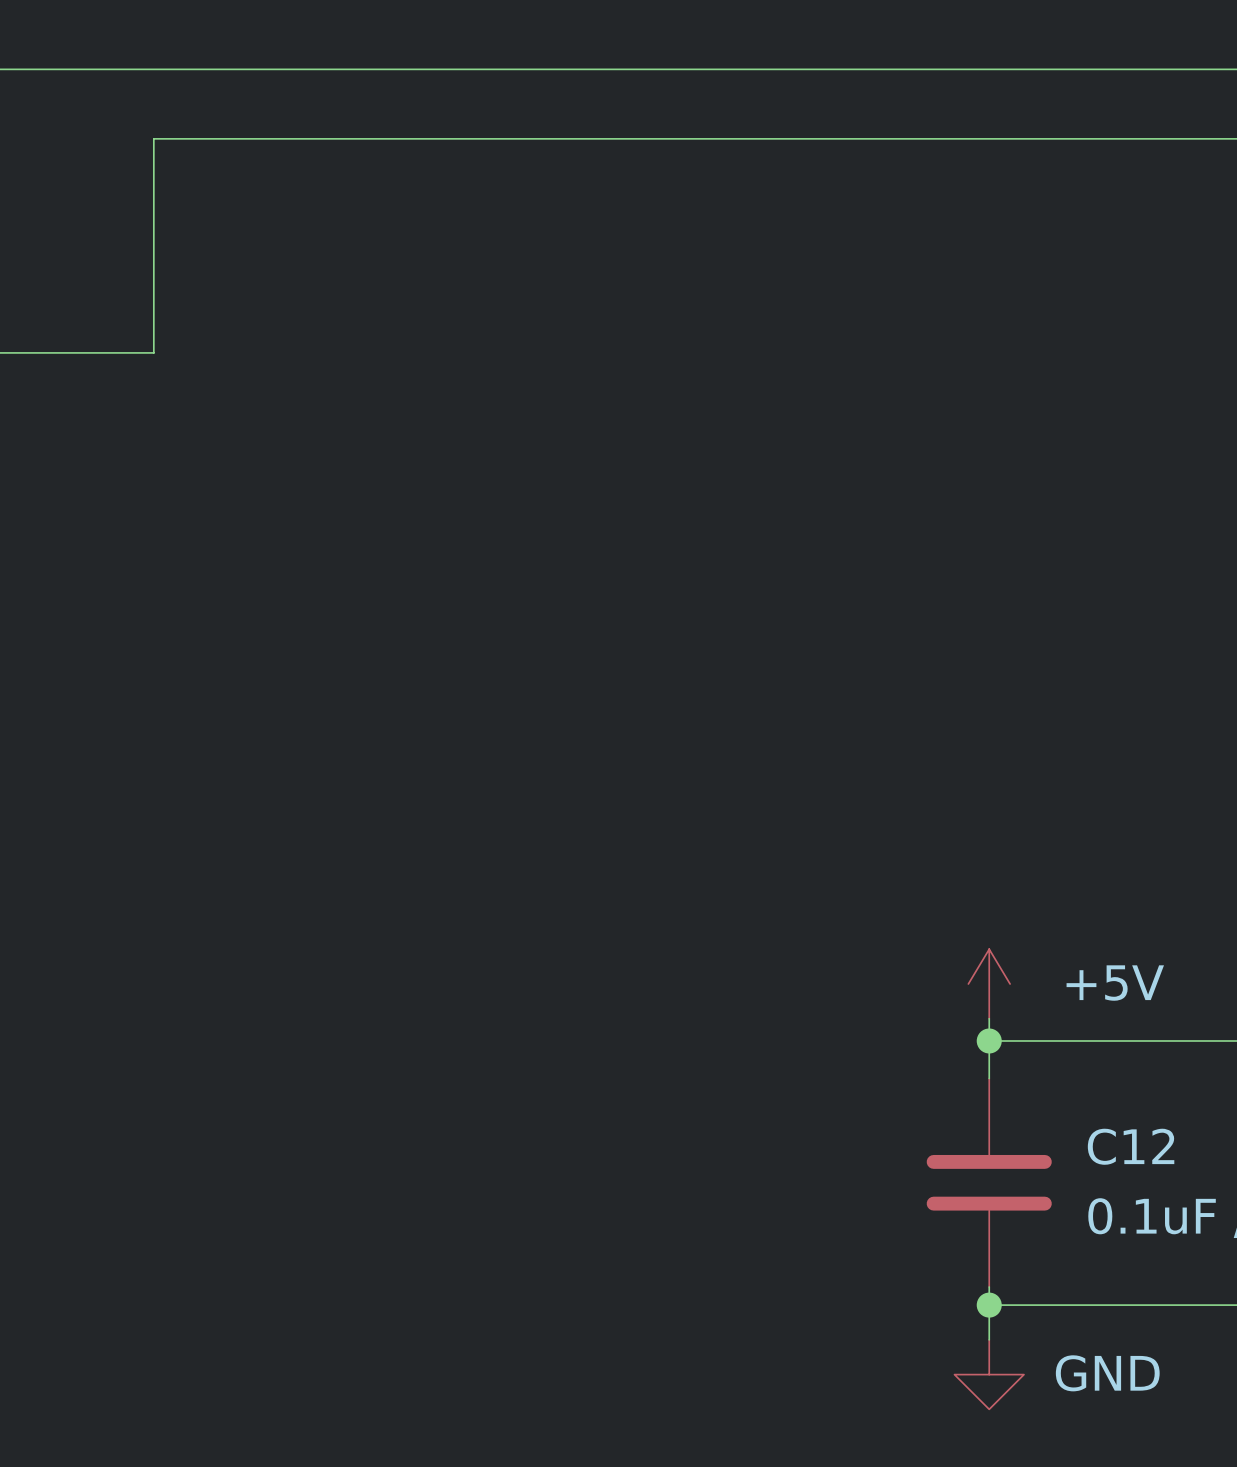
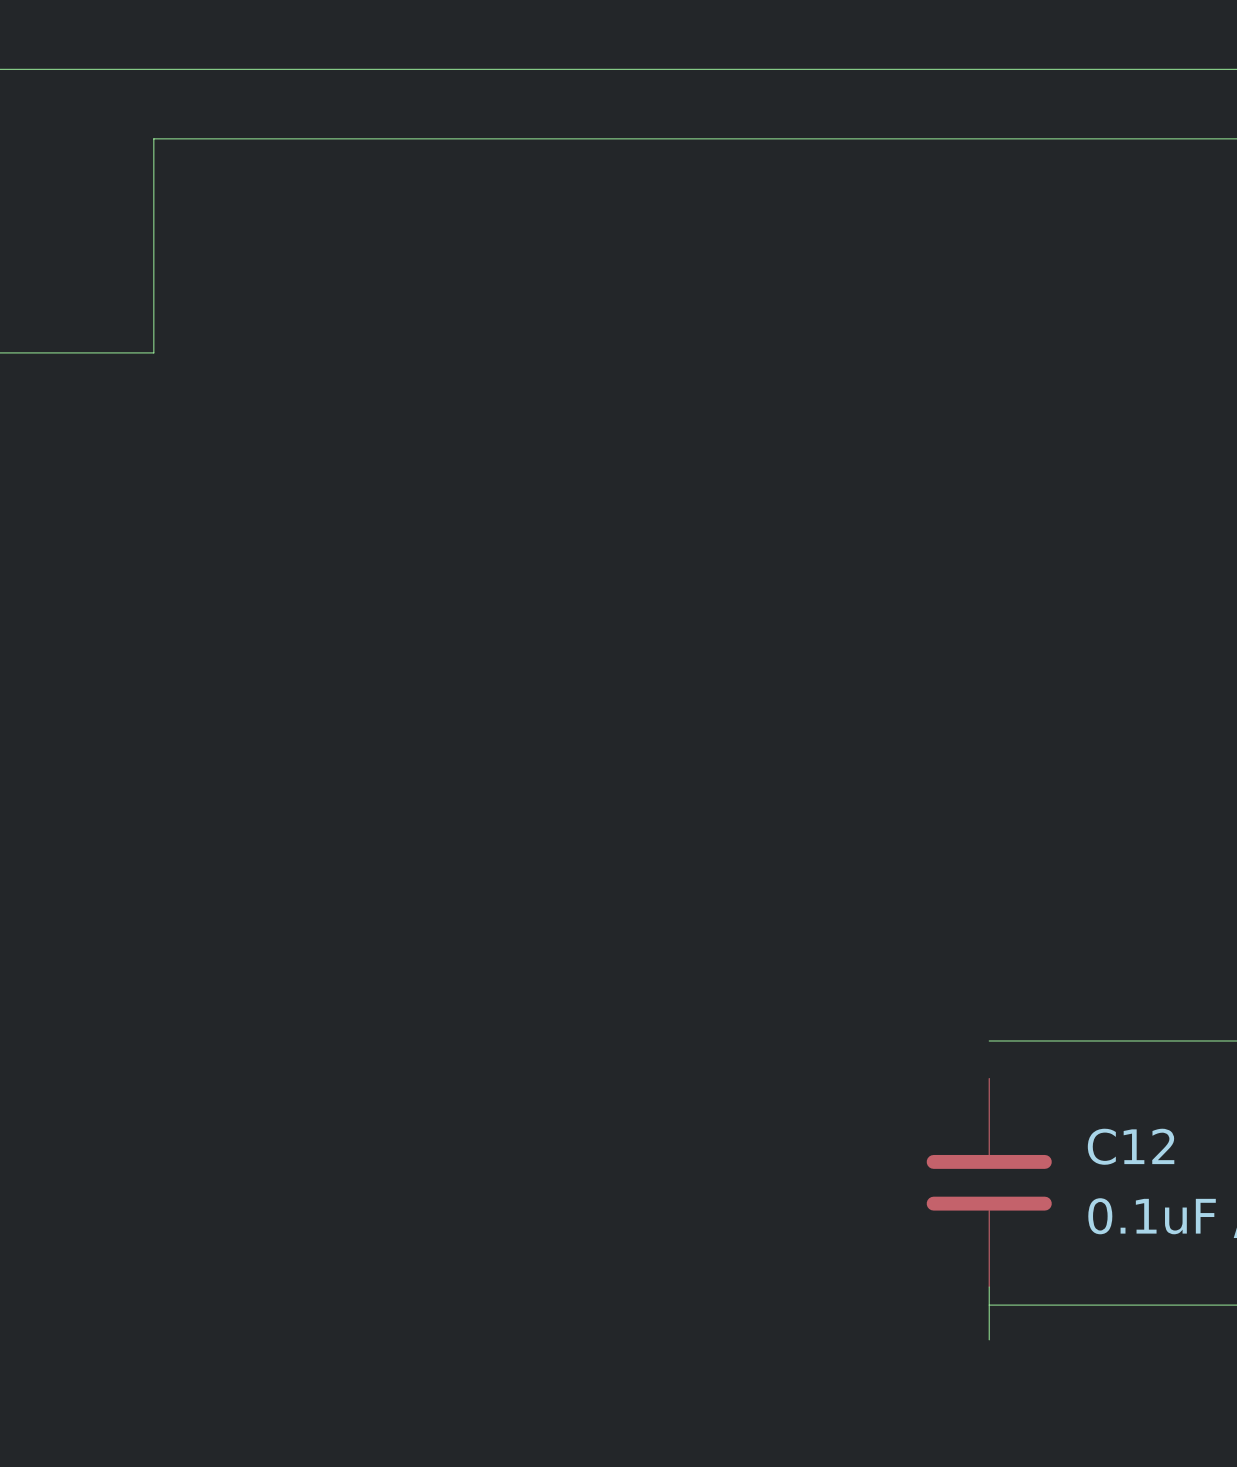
power symbol: +5V (989, 984) -> none
wire: (989, 1018) (989, 1078) -> none
junction: (989, 1040) -> none
junction: (989, 1305) -> none
power symbol: GND (989, 1374) -> none

